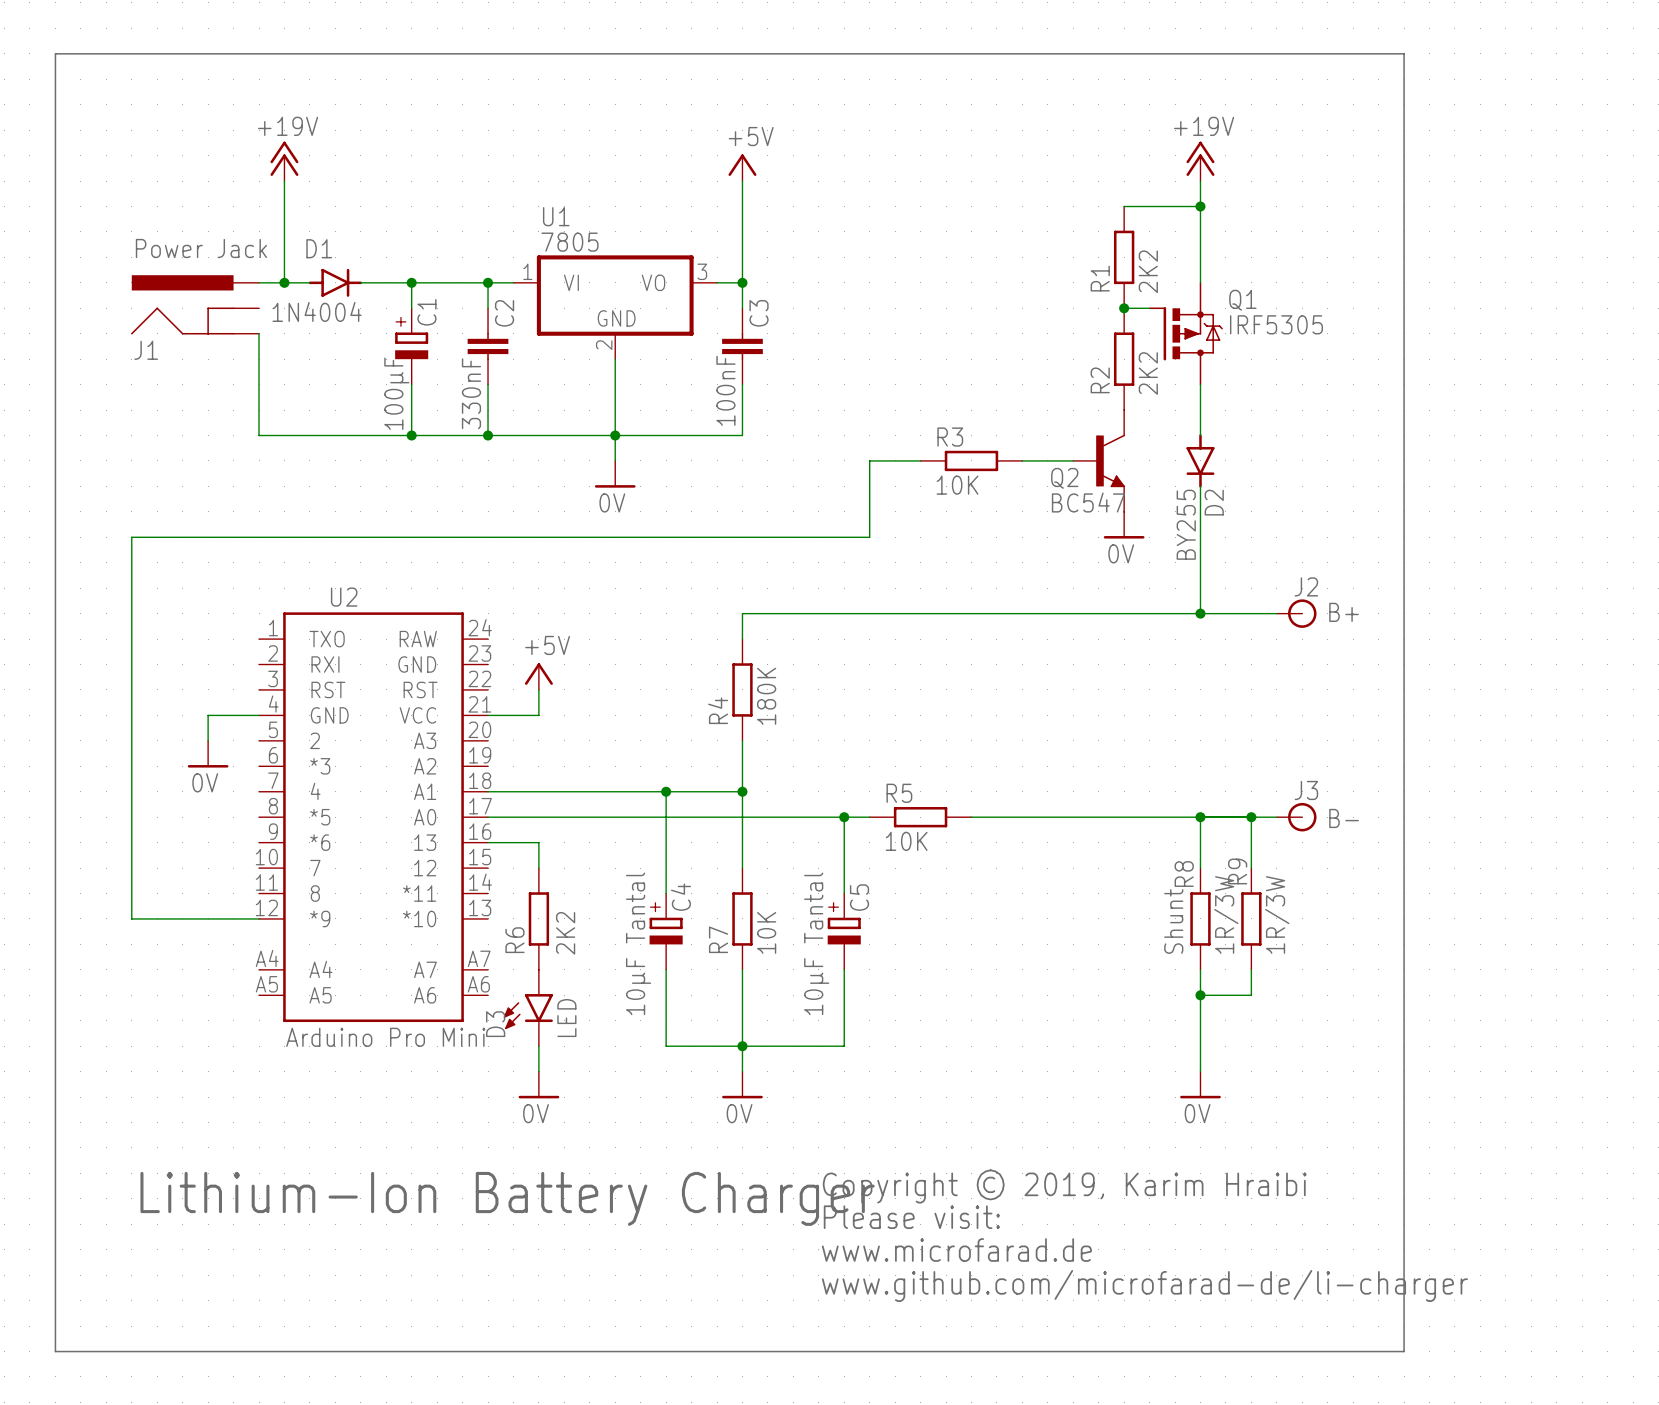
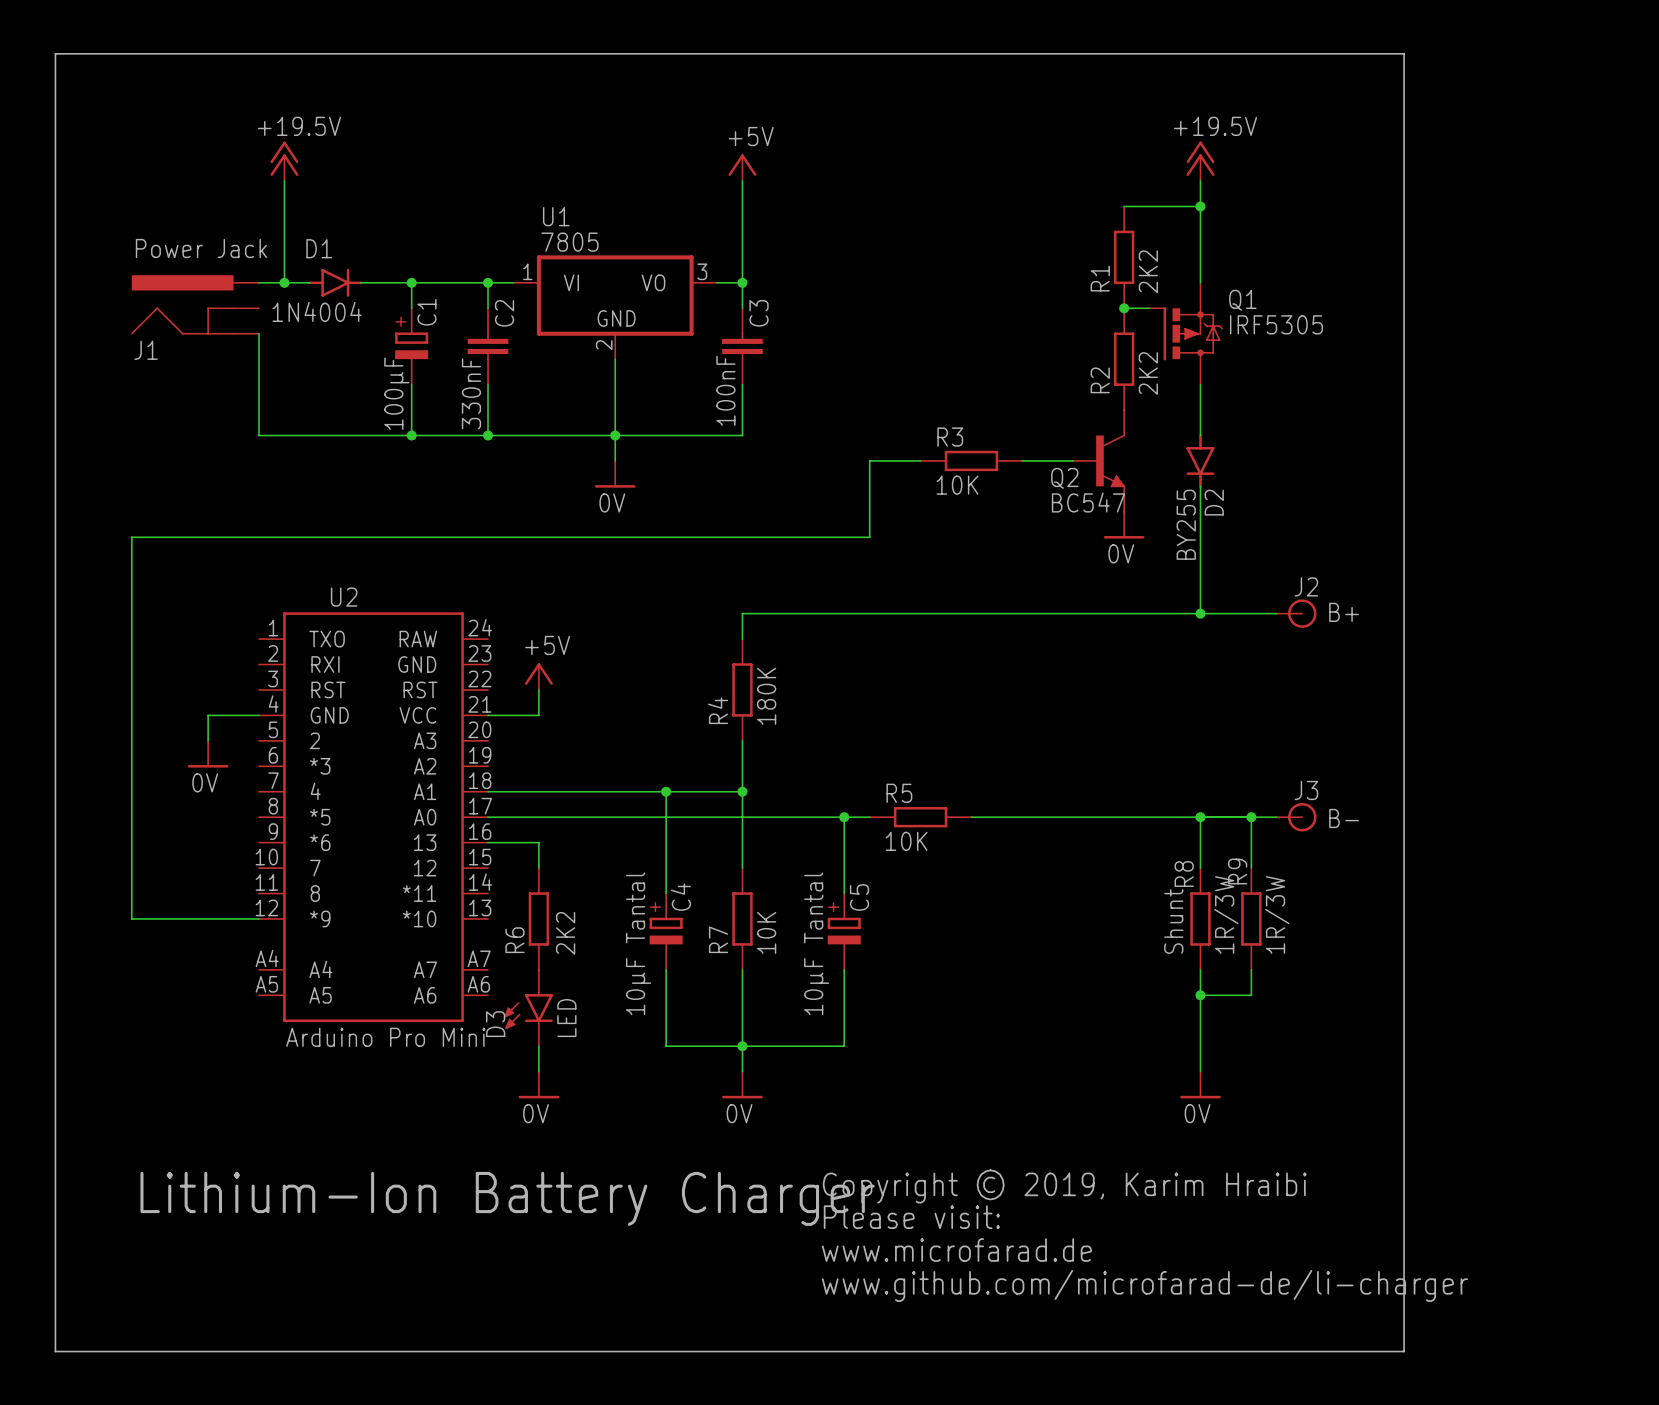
power symbol: +19V (284, 161) -> +19.5V (284, 161)
power symbol: +19V (1200, 161) -> +19.5V (1200, 161)

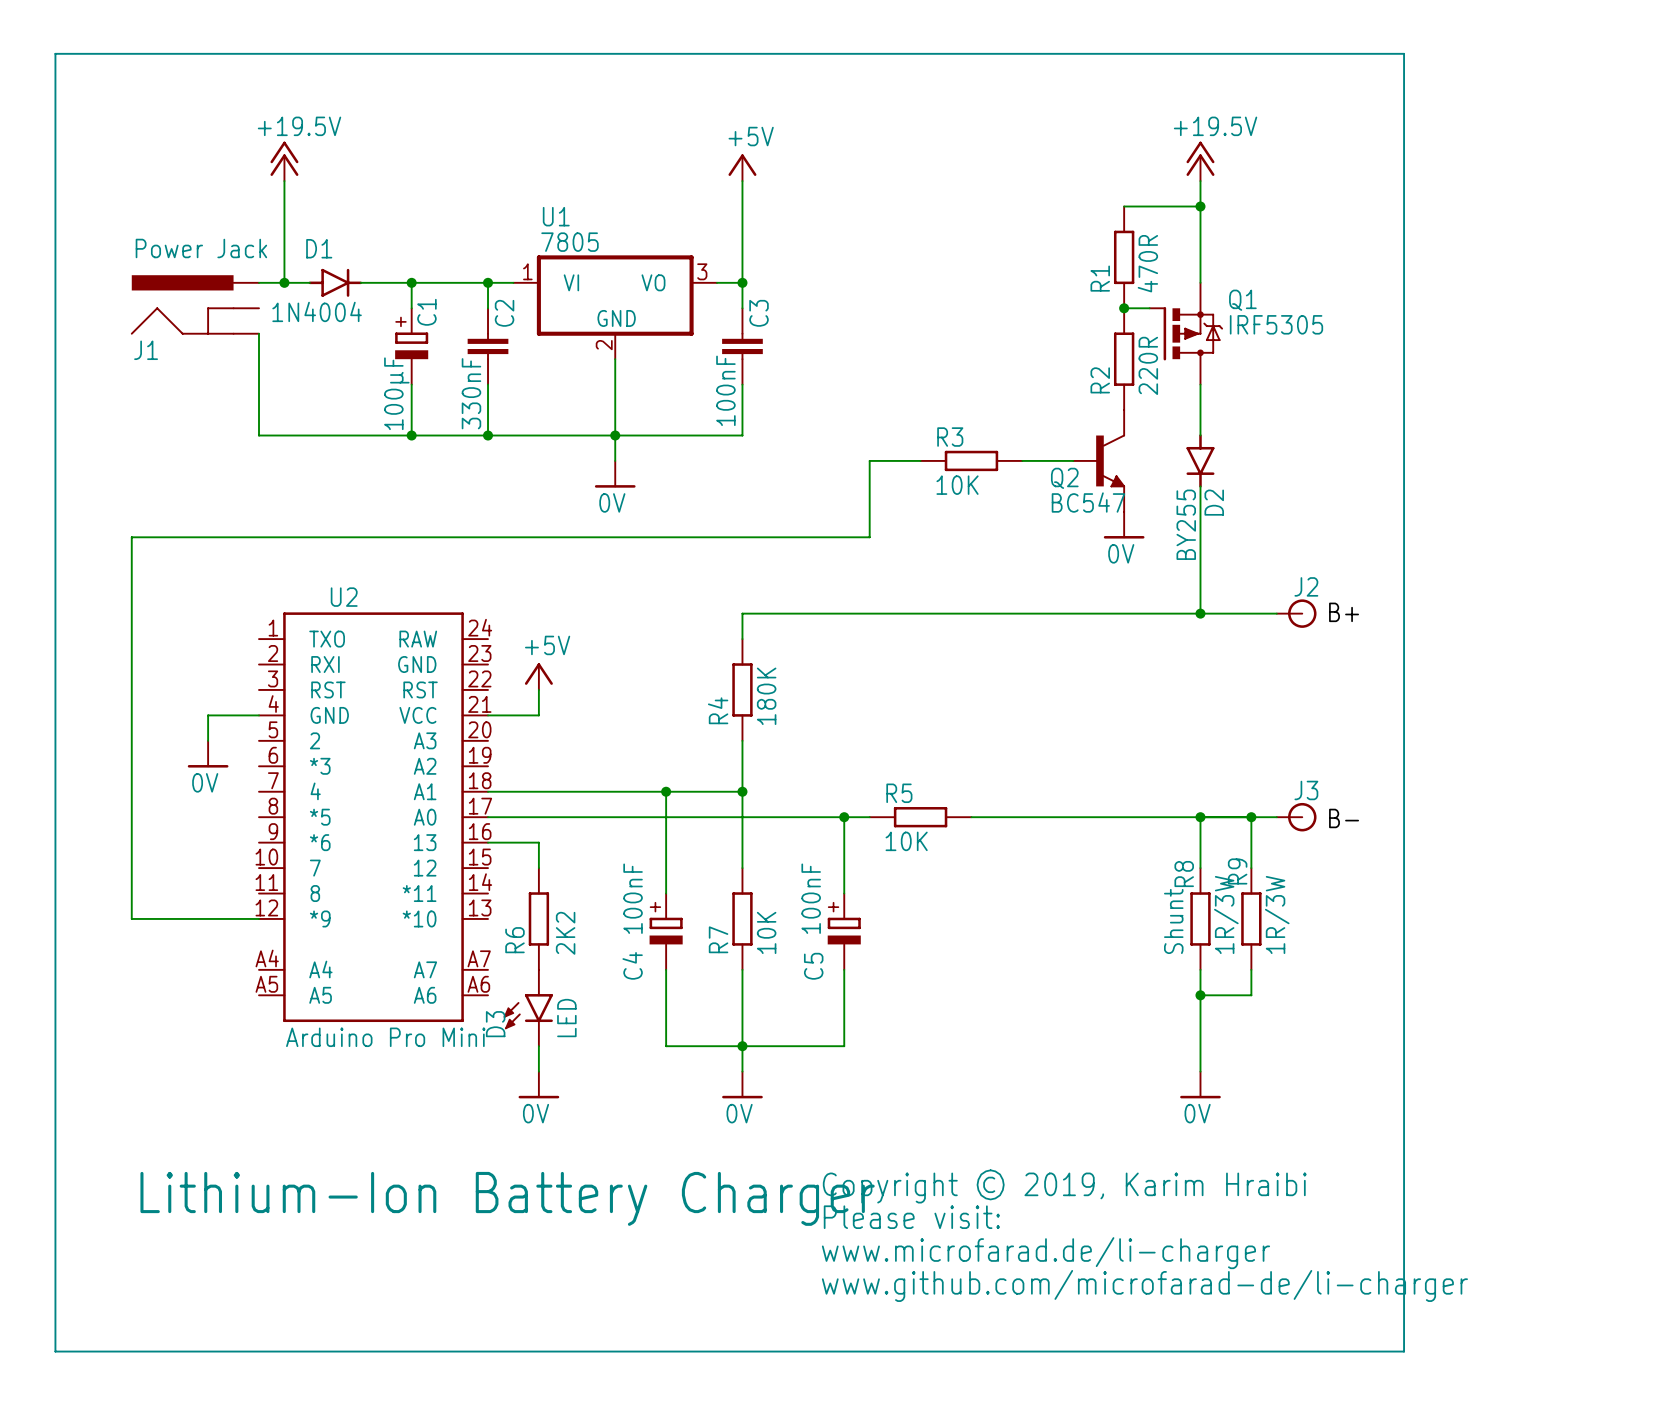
R1 value: 2K2 (1148, 271) -> 470R (1147, 263)
R2 value: 2K2 (1148, 373) -> 220R (1148, 365)
C4 name position: C4 (680, 897) -> C4 (632, 965)
C5 name position: C5 (859, 897) -> C5 (813, 966)
C4 value: 10µF Tantal (638, 943) -> 100nF (633, 898)
C5 value: 10µF Tantal (816, 943) -> 100nF (811, 898)
text: www.microfarad.de (956, 1250) -> www.microfarad.de/li-charger (1045, 1253)

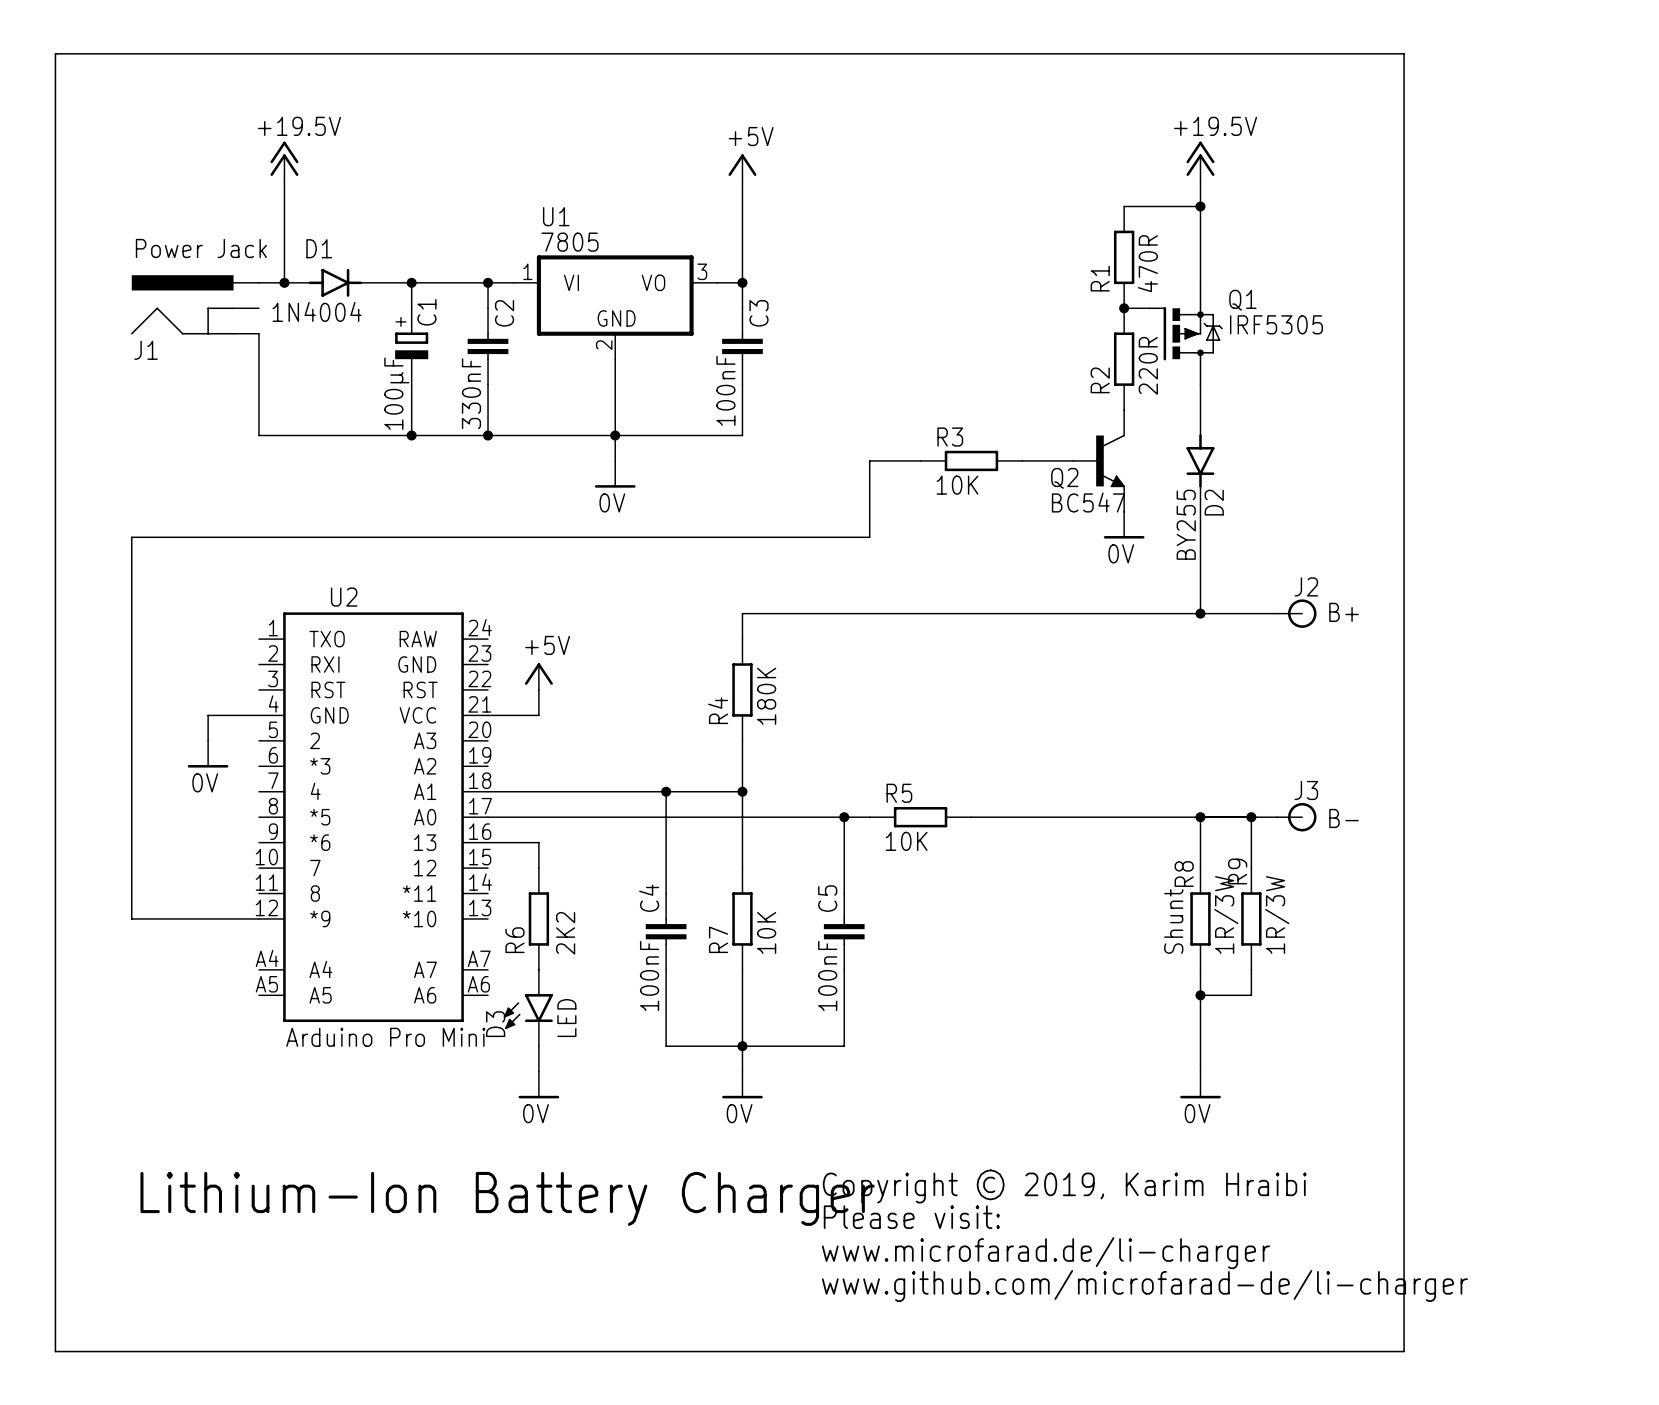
C4 symbol: [649, 893, 683, 970] -> [645, 893, 687, 970]
C5 symbol: [827, 893, 861, 970] -> [823, 893, 865, 970]
C4 value position: 100nF (633, 898) -> 100nF (649, 976)
C5 value position: 100nF (811, 898) -> 100nF (827, 976)
C4 name position: C4 (632, 965) -> C4 (649, 898)
C5 name position: C5 (813, 966) -> C5 (827, 898)

